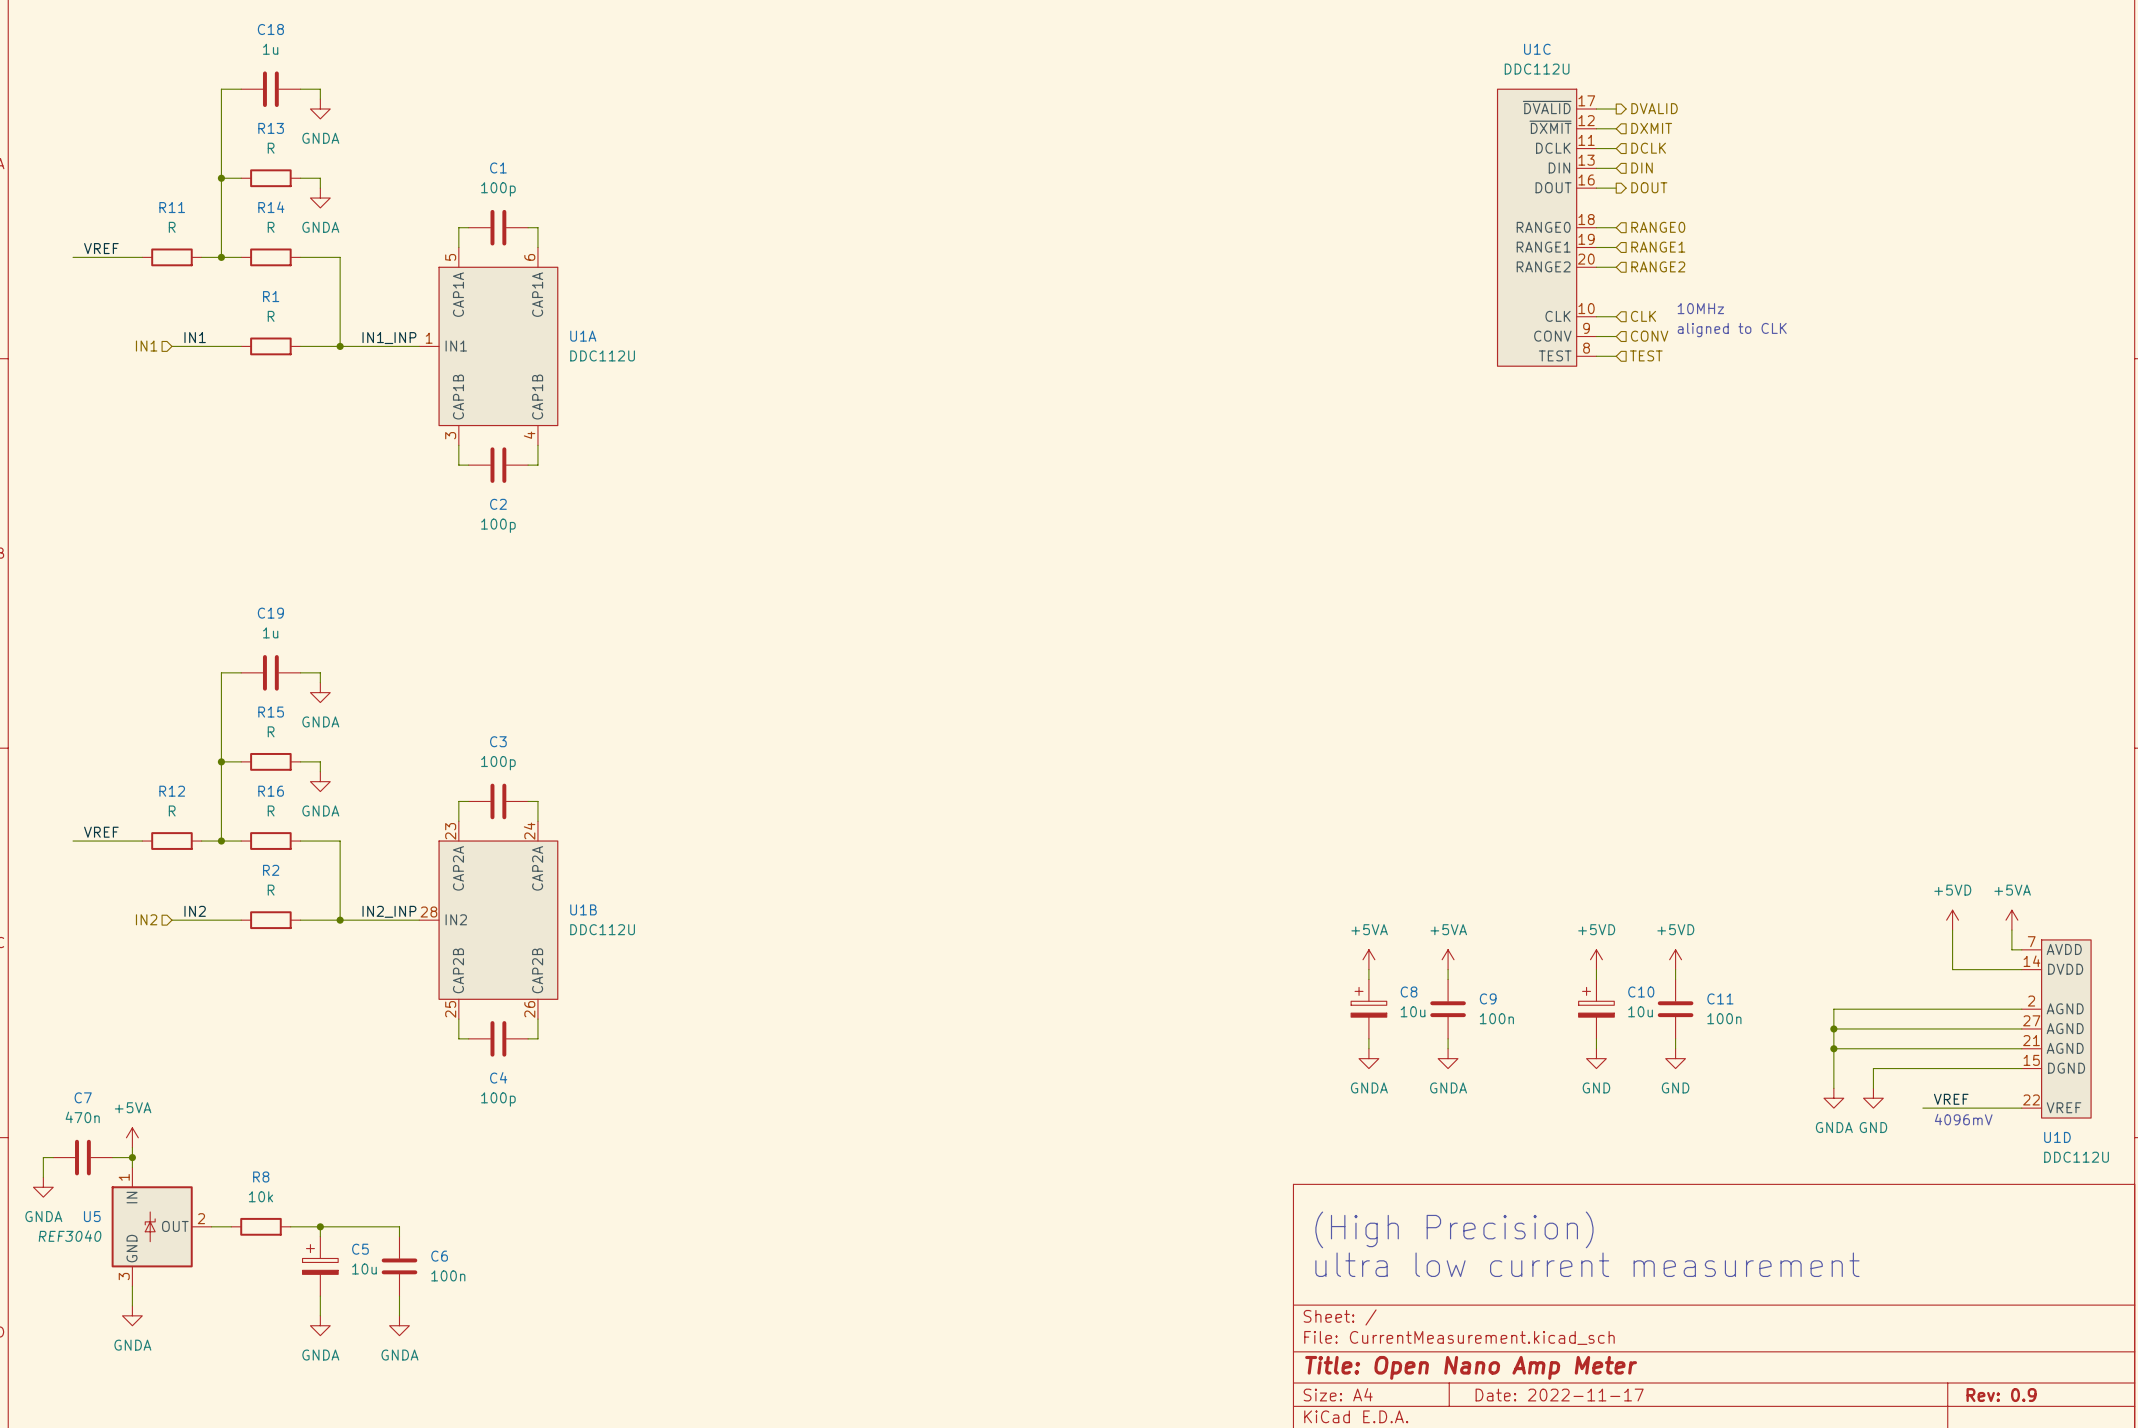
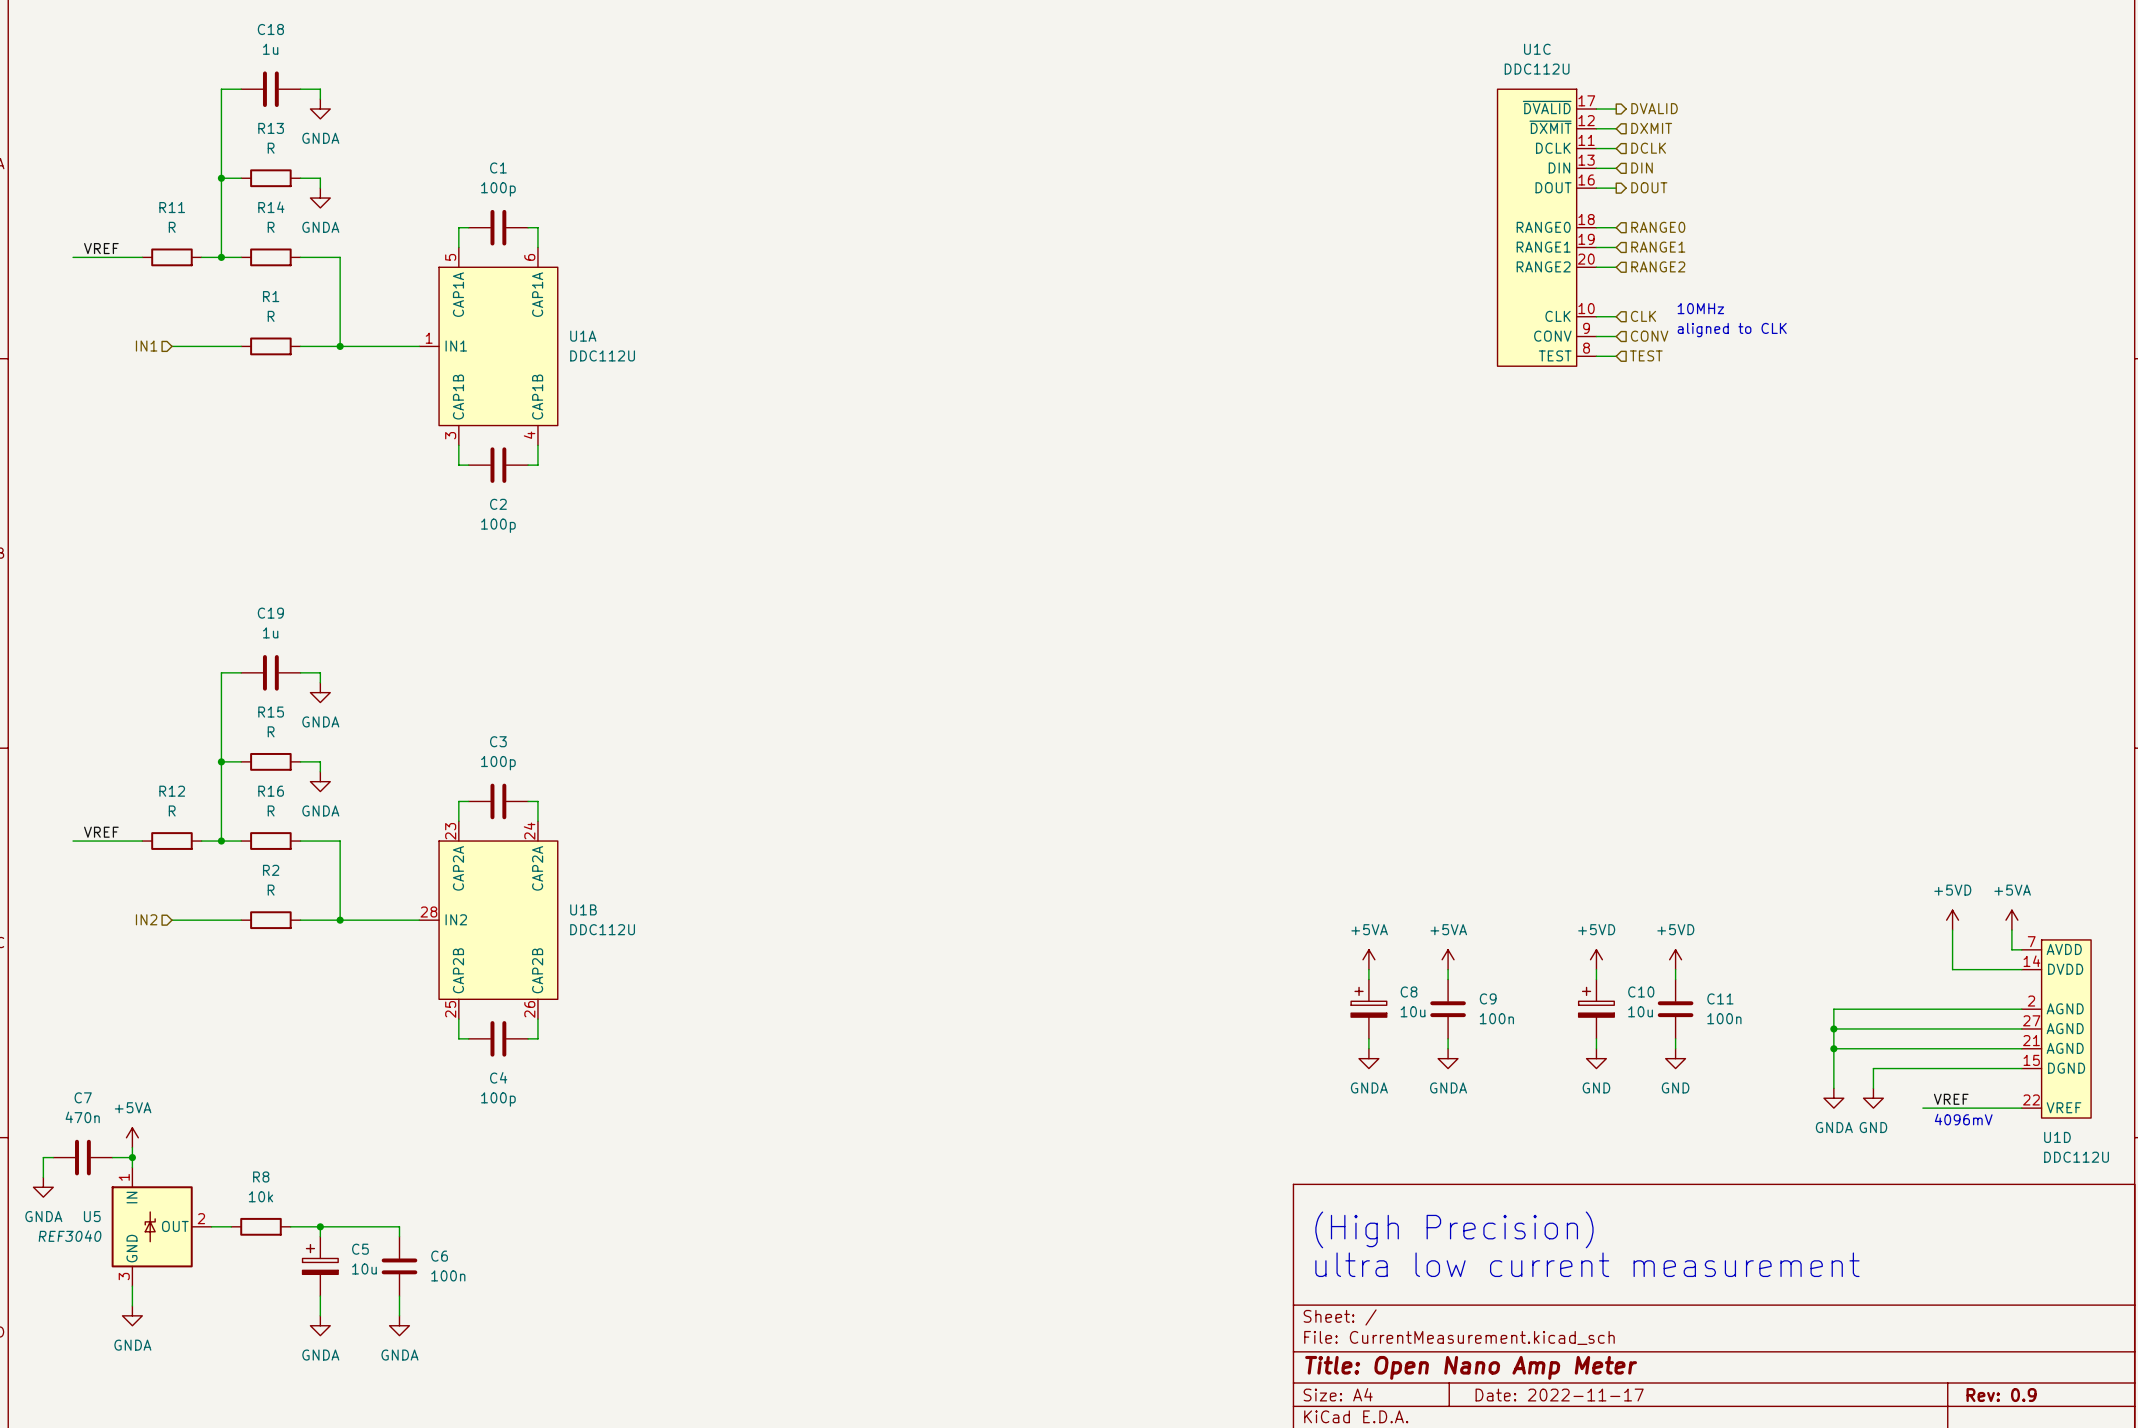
label: IN1 (195, 337) -> none
label: IN1_INP (389, 338) -> none
label: IN2 (195, 911) -> none
label: IN2_INP (389, 911) -> none

